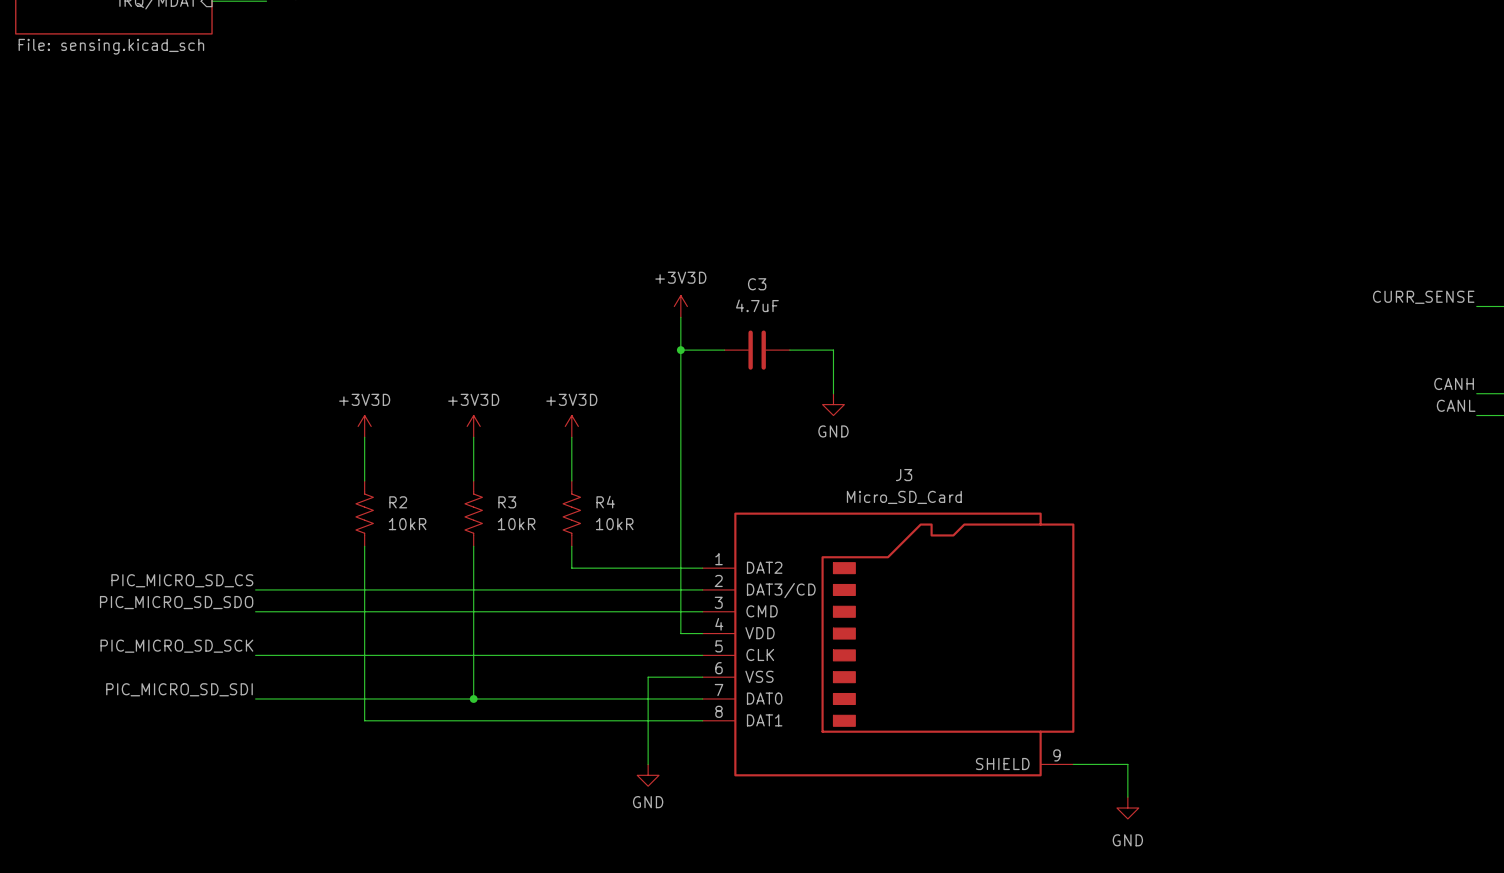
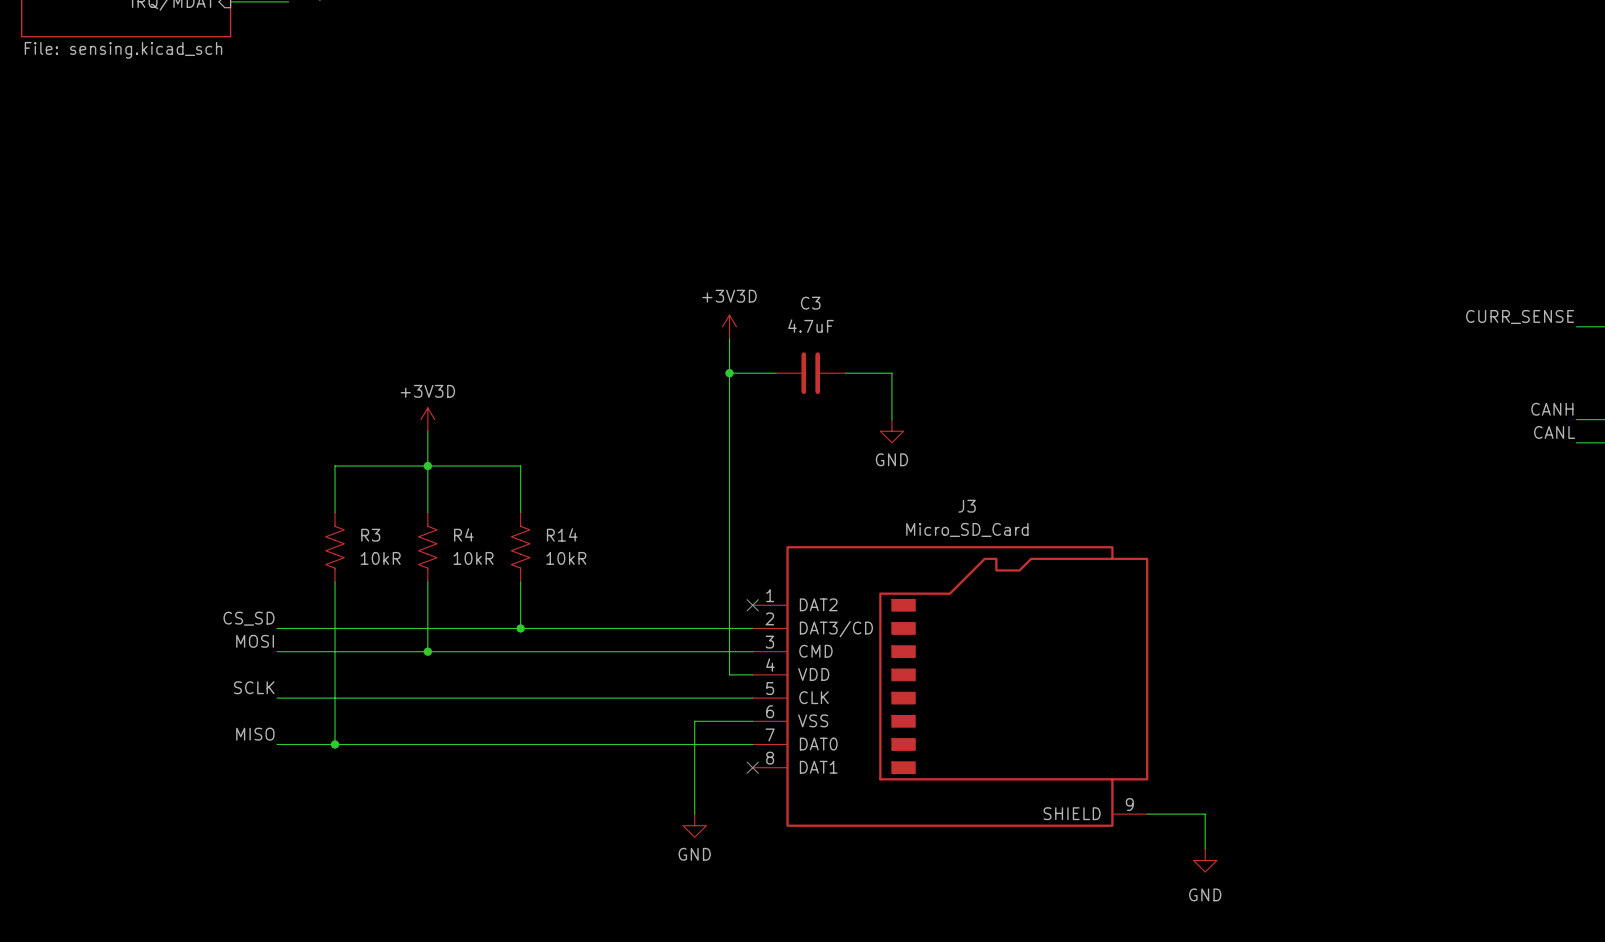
power symbol: none -> +3V3D (427, 419)
wire: none -> (427, 431) (427, 512)
power symbol: +3V3D (364, 426) -> none
power symbol: +3V3D (473, 426) -> none
power symbol: +3V3D (571, 426) -> none
wire: (364, 437) (364, 480) -> none
junction: none -> (427, 466)
wire: (473, 437) (473, 480) -> (520, 582) (520, 628)
wire: (571, 437) (571, 480) -> none
wire: none -> (335, 512) (335, 466) (520, 466) (520, 512)
R2: 10kR (364, 513) -> none
R3 position: (473, 513) -> (335, 547)
R14: none -> 10kR (520, 547)
R4 position: (571, 513) -> (427, 547)
wire: (364, 546) (364, 720) (702, 720) -> none
wire: none -> (427, 582) (427, 651)
wire: (473, 546) (473, 698) -> (335, 582) (335, 744)
wire: (571, 546) (571, 568) (702, 568) -> none
no-connect mark: none -> (752, 605)
label: PIC_MICRO_SD_CS (182, 580) -> CS_SD (249, 618)
junction: none -> (520, 628)
label: PIC_MICRO_SD_SDO (176, 602) -> MOSI (255, 641)
junction: none -> (427, 651)
label: PIC_MICRO_SD_SCK (176, 646) -> SCLK (254, 687)
label: PIC_MICRO_SD_SDI (179, 689) -> MISO (255, 734)
junction: none -> (335, 744)
junction: (473, 698) -> none
no-connect mark: none -> (752, 767)

